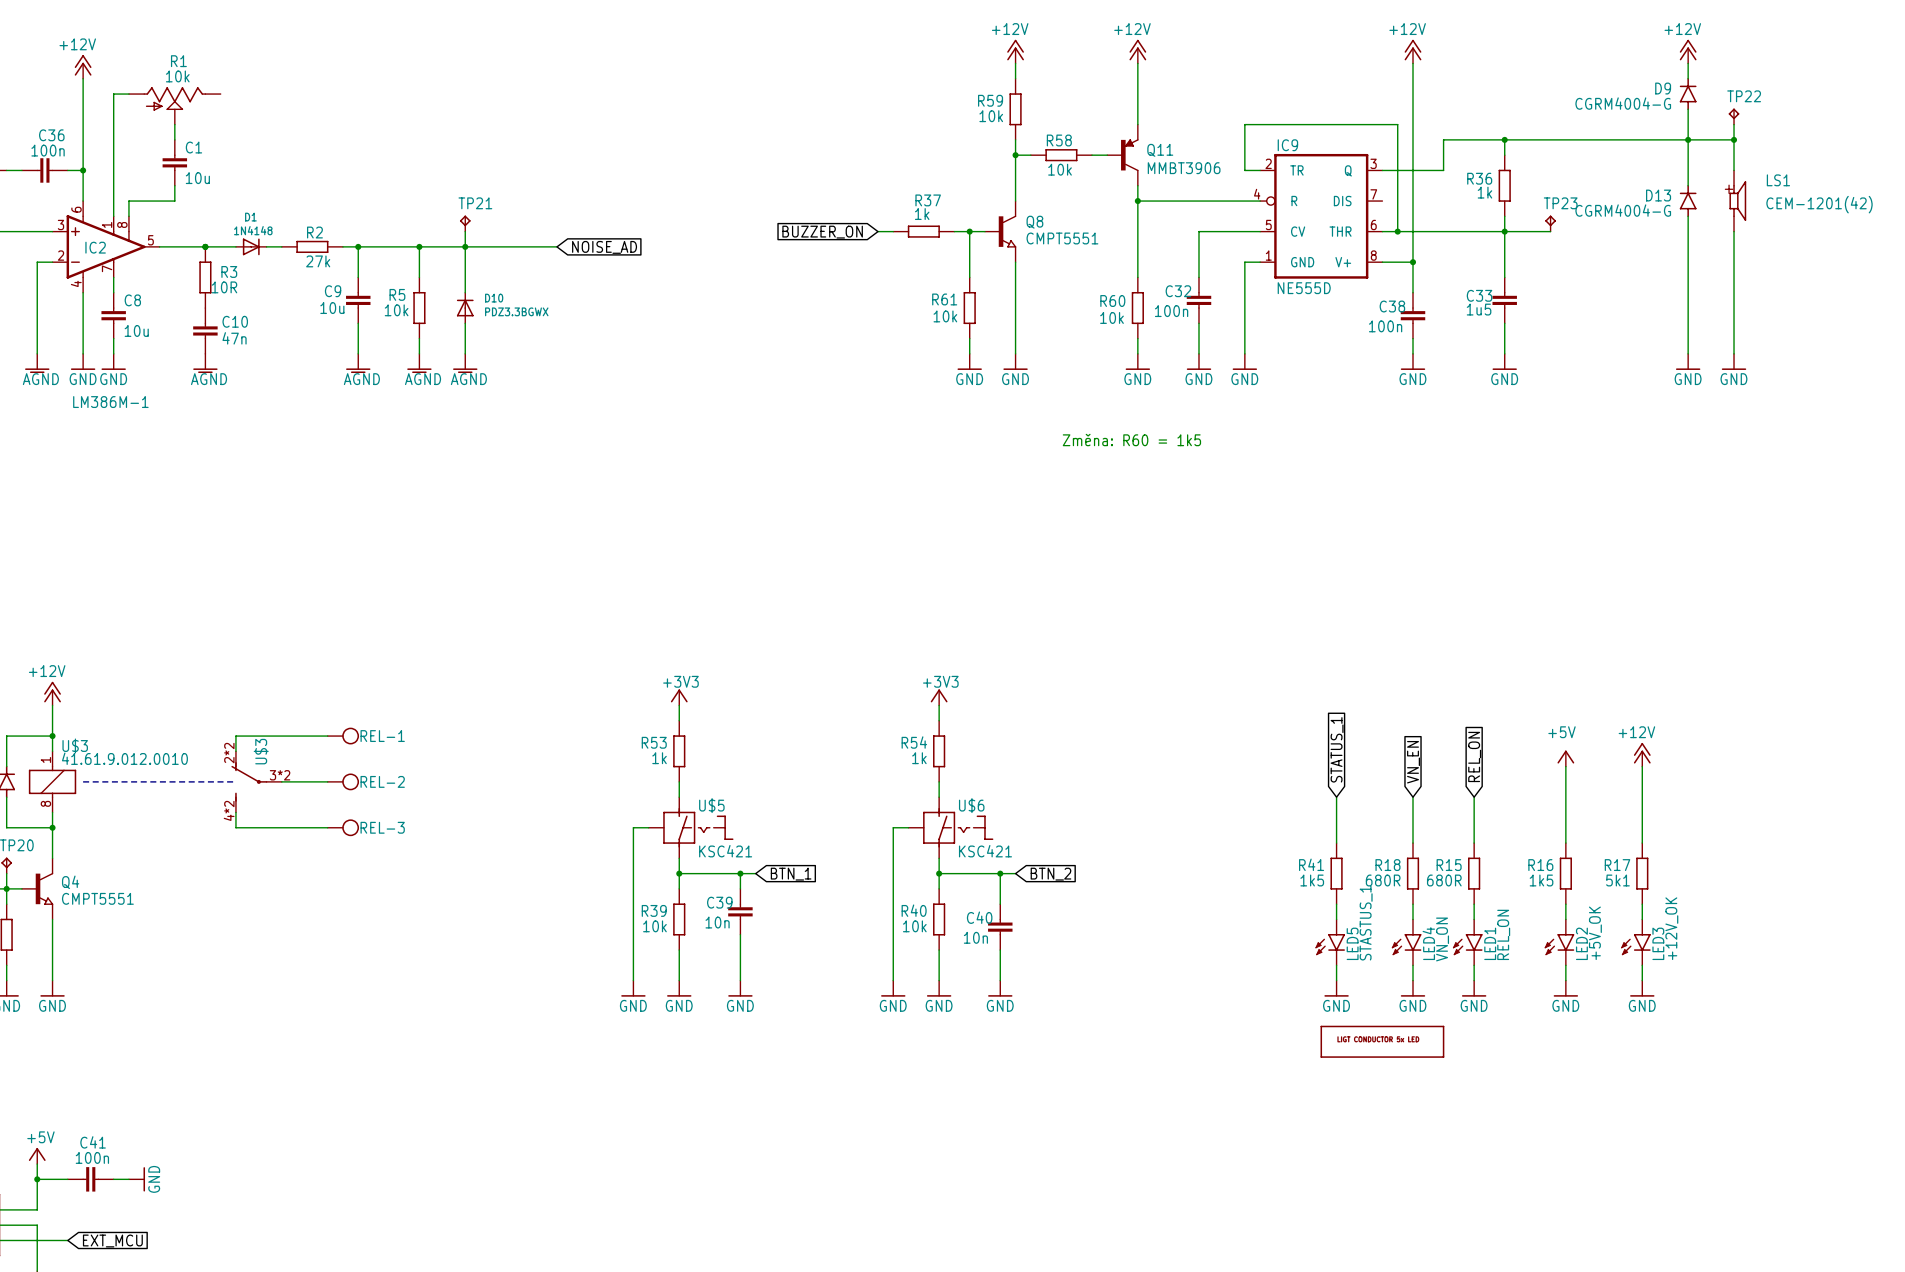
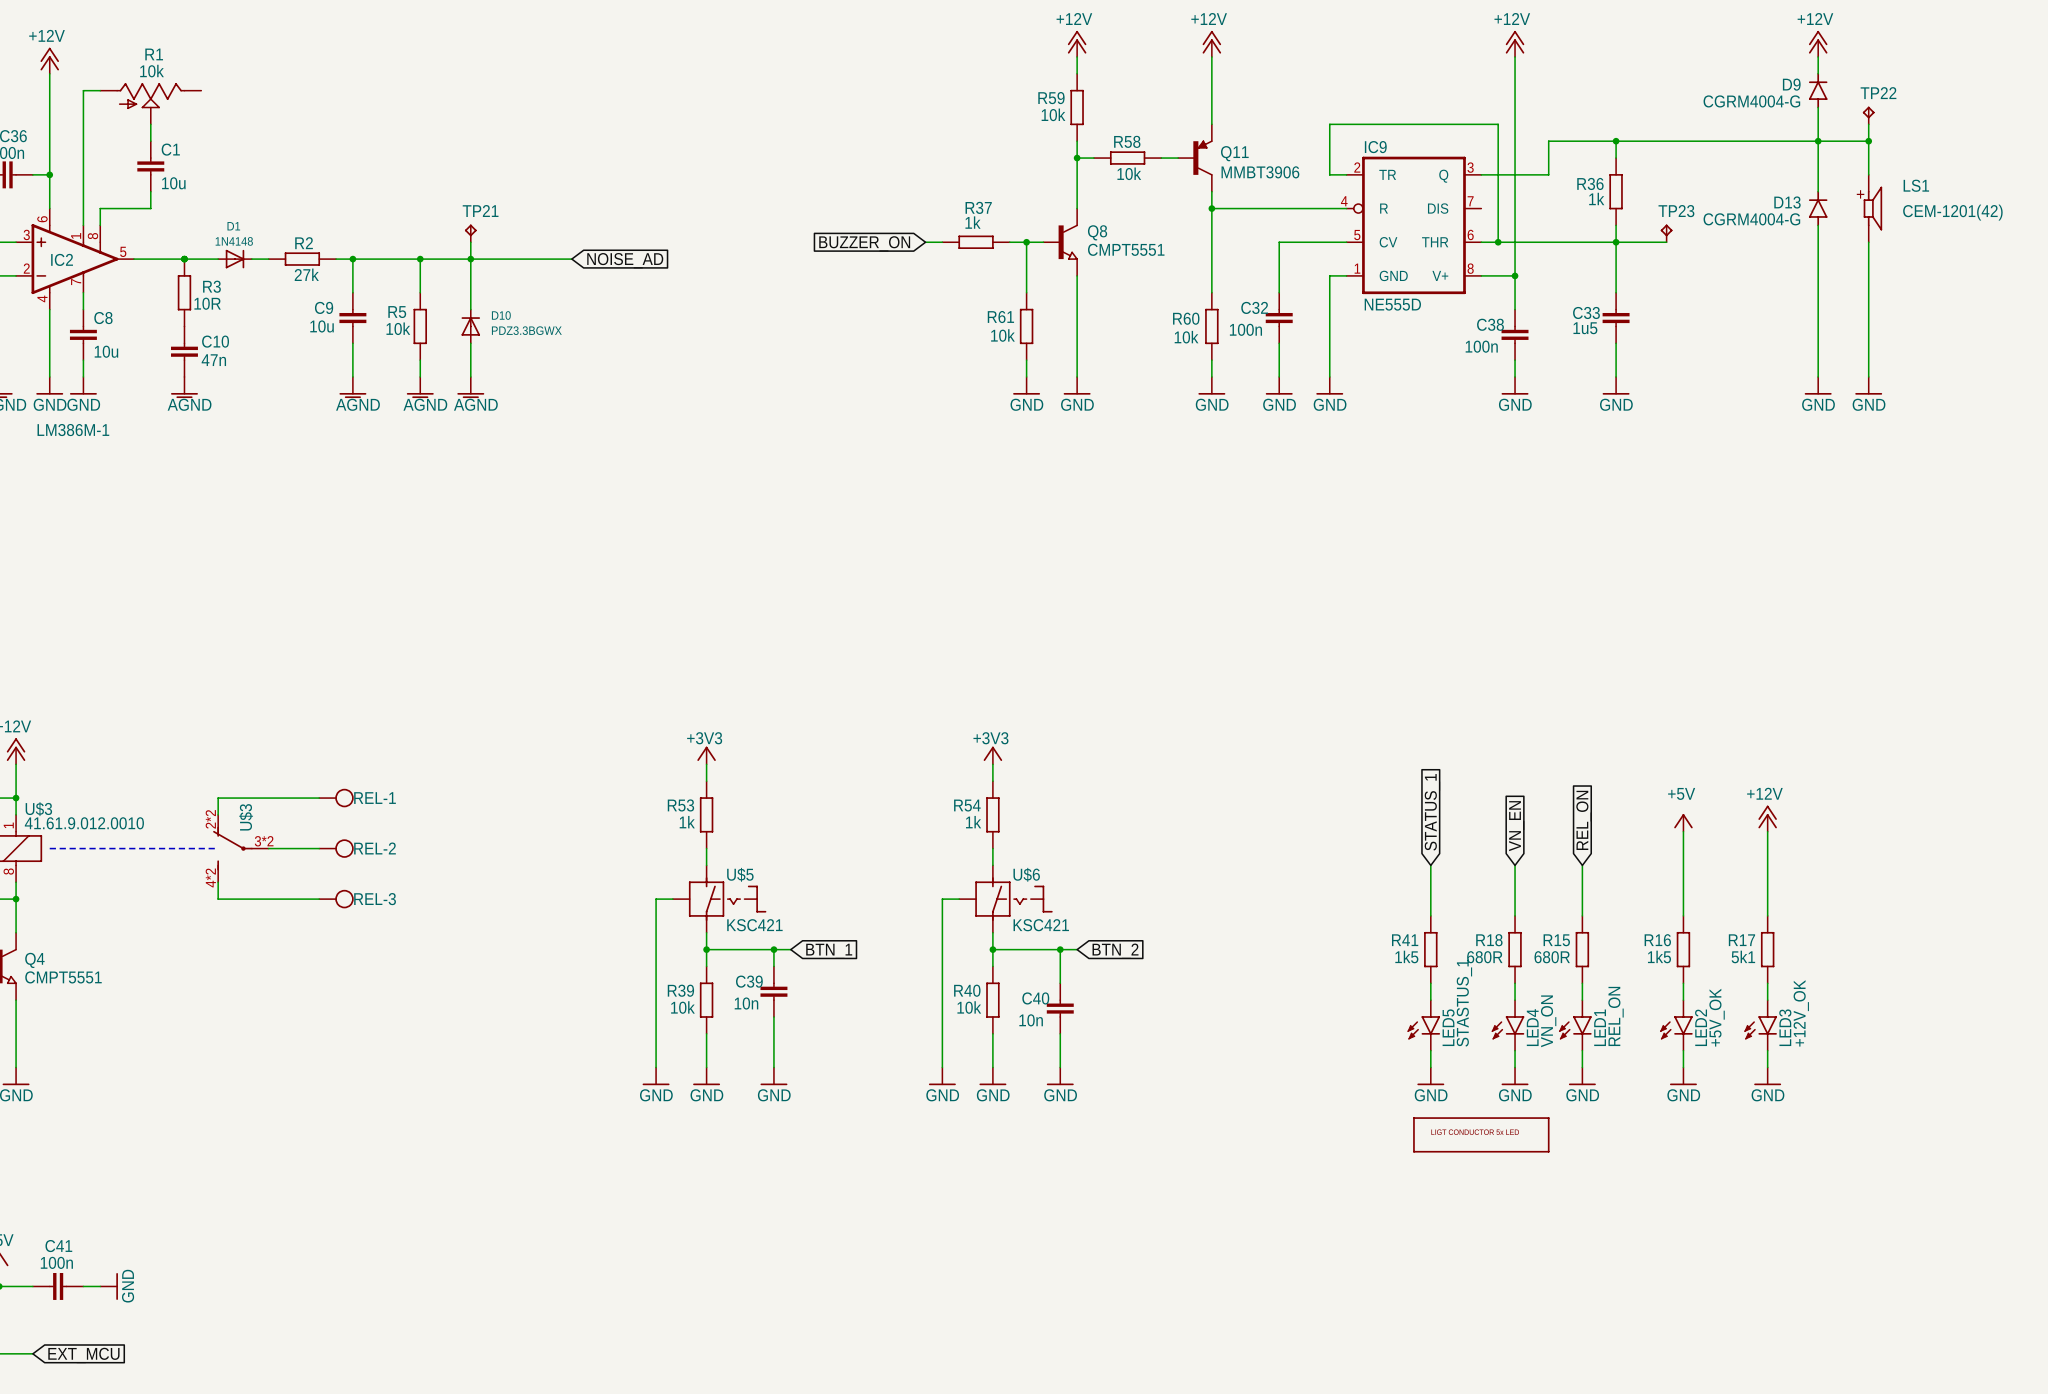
text: Změna: R60 = 1k5 (1131, 440) -> none

